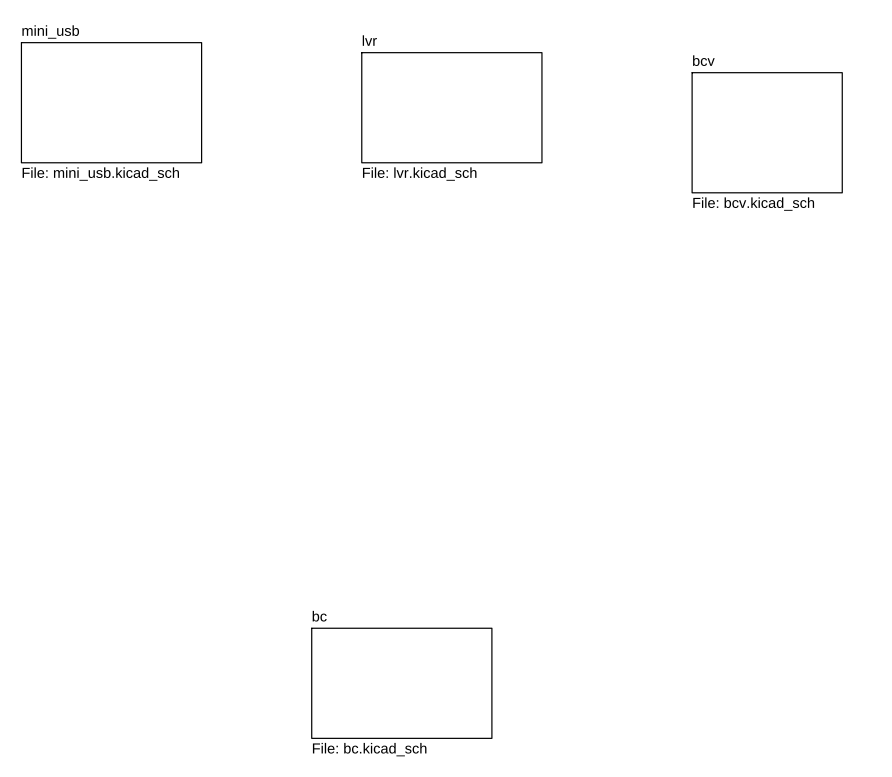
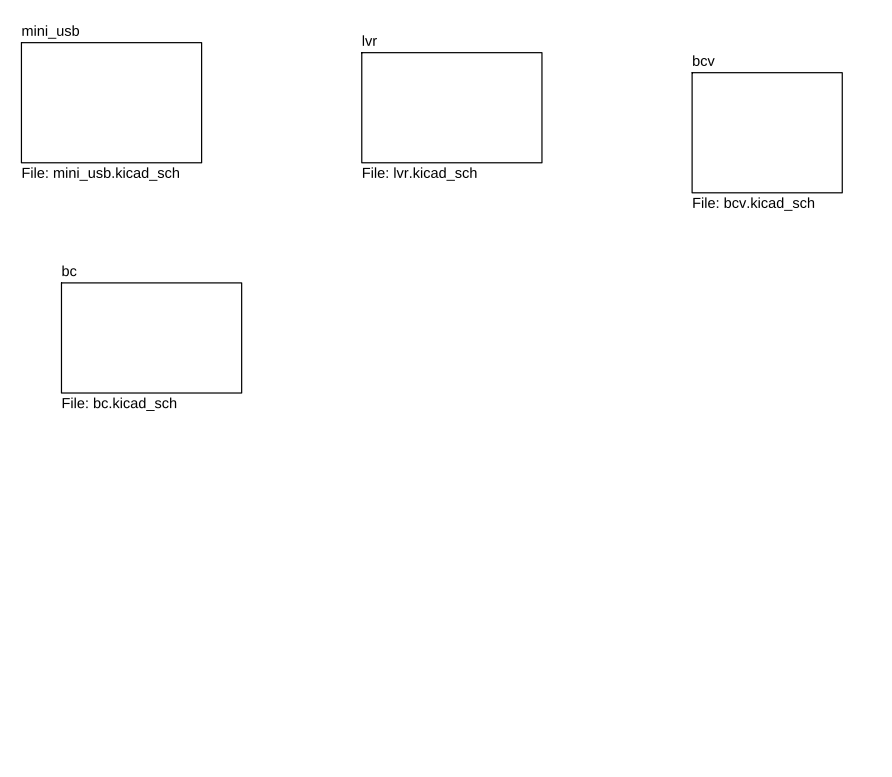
sheet bc: none -> File: bc.kicad_sch (151, 337)
sheet bc: File: bc.kicad_sch (401, 683) -> none

